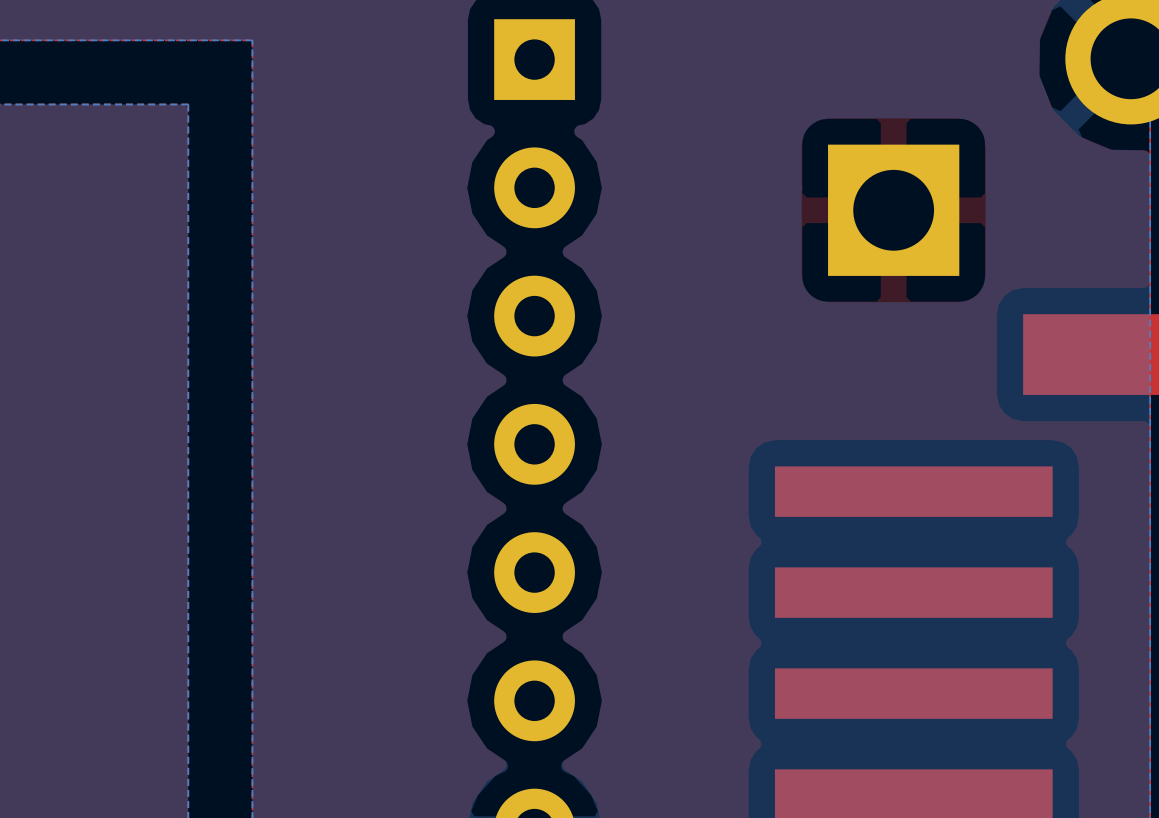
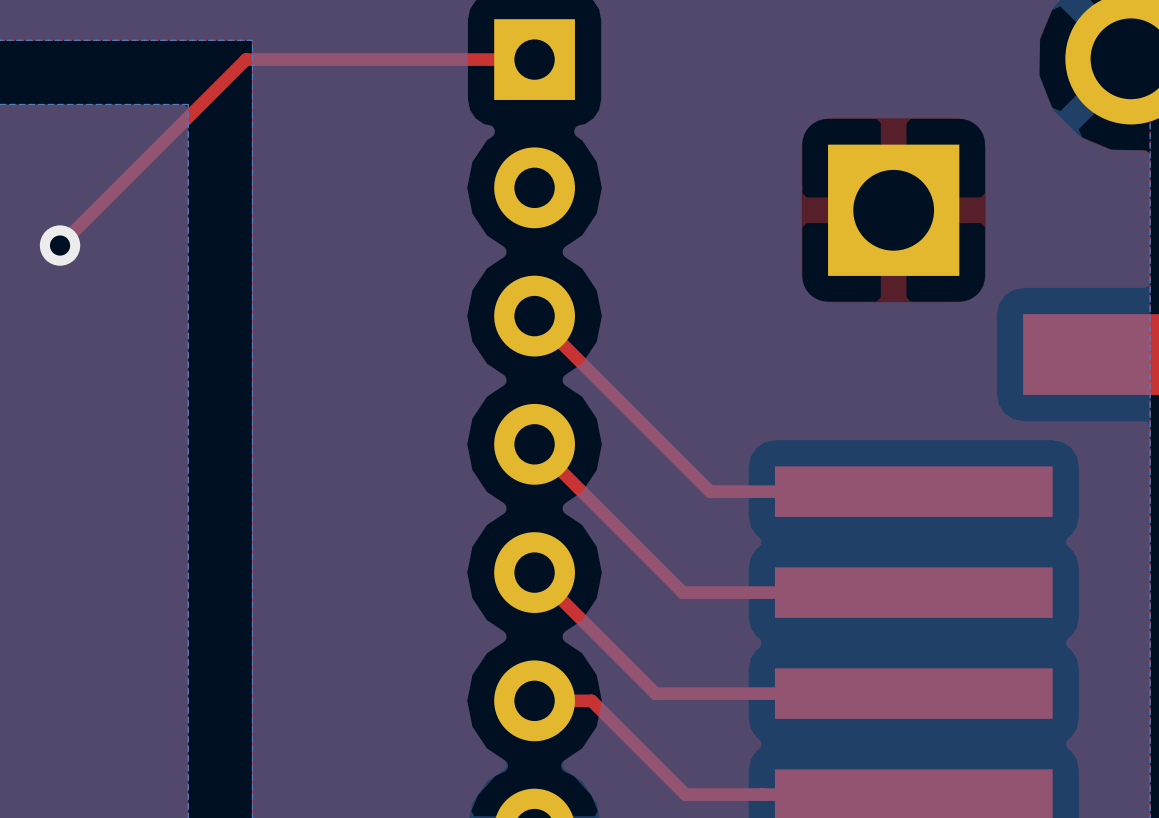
top track: none -> (534, 59) (246, 59) (60, 245)
via: none -> (60, 245)
top track: none -> (534, 316) (710, 491) (913, 491)
top track: none -> (534, 444) (682, 592) (913, 592)
top track: none -> (534, 572) (655, 693) (913, 693)
top track: none -> (534, 700) (591, 700) (685, 794) (913, 794)

